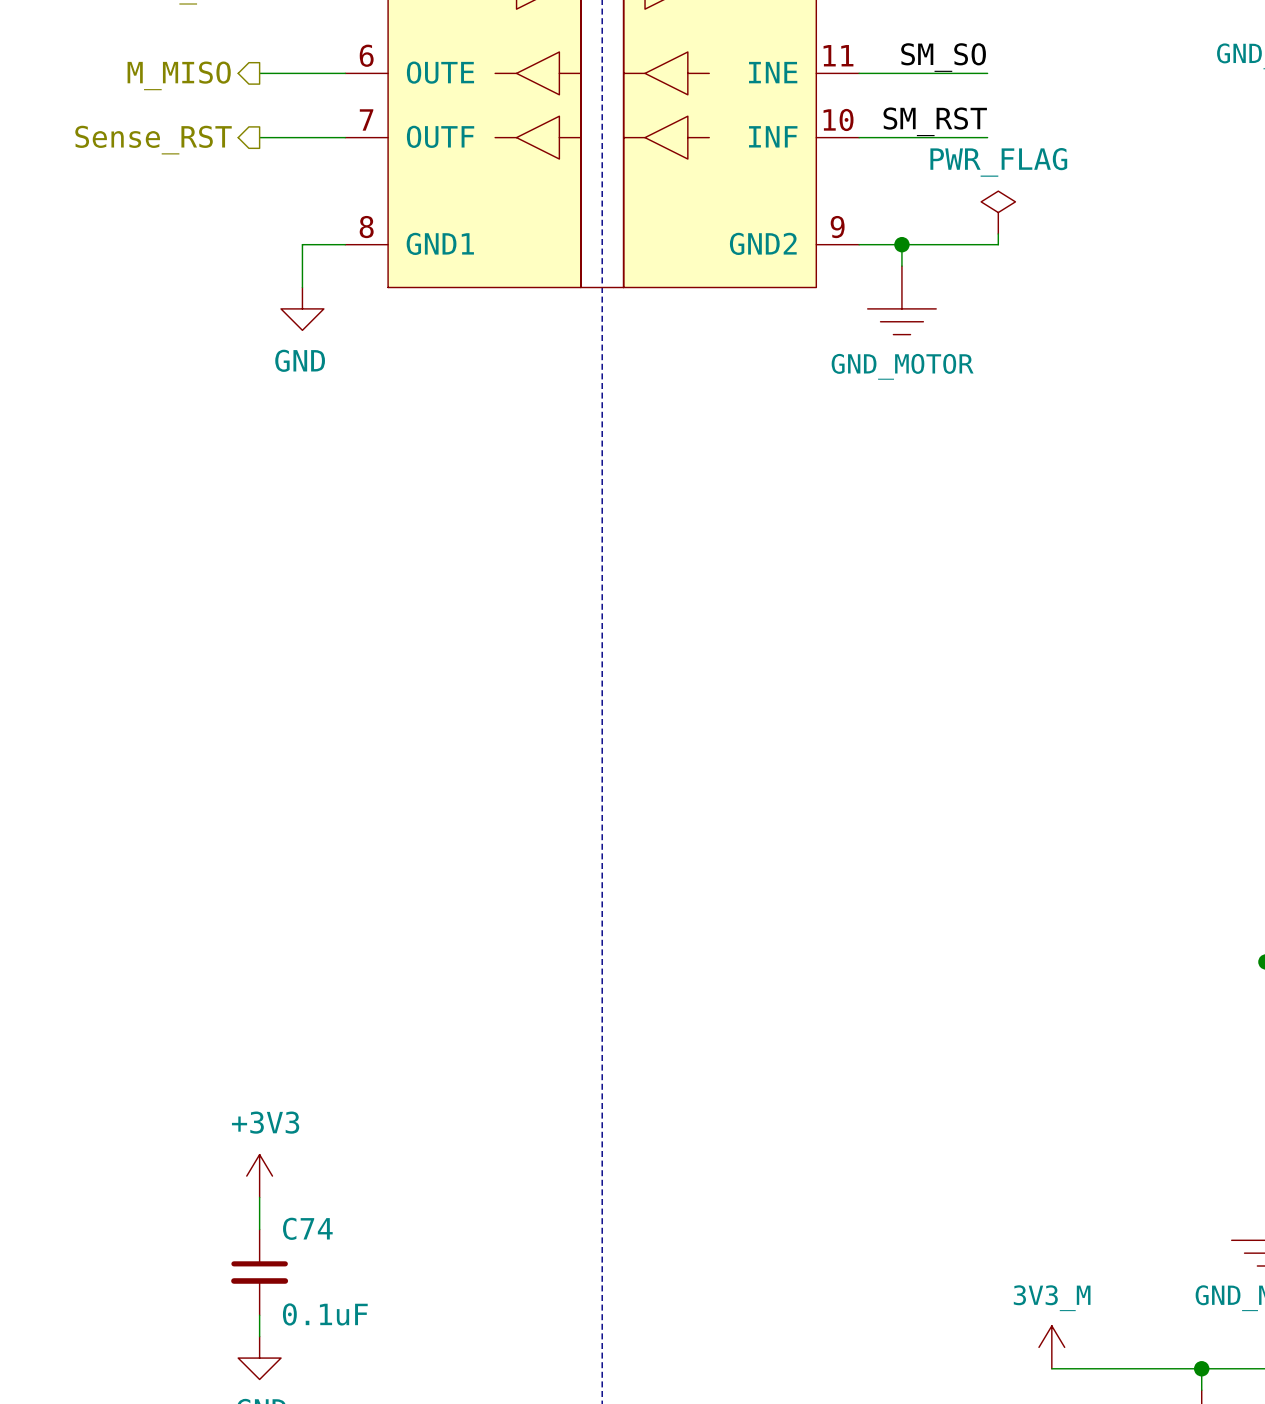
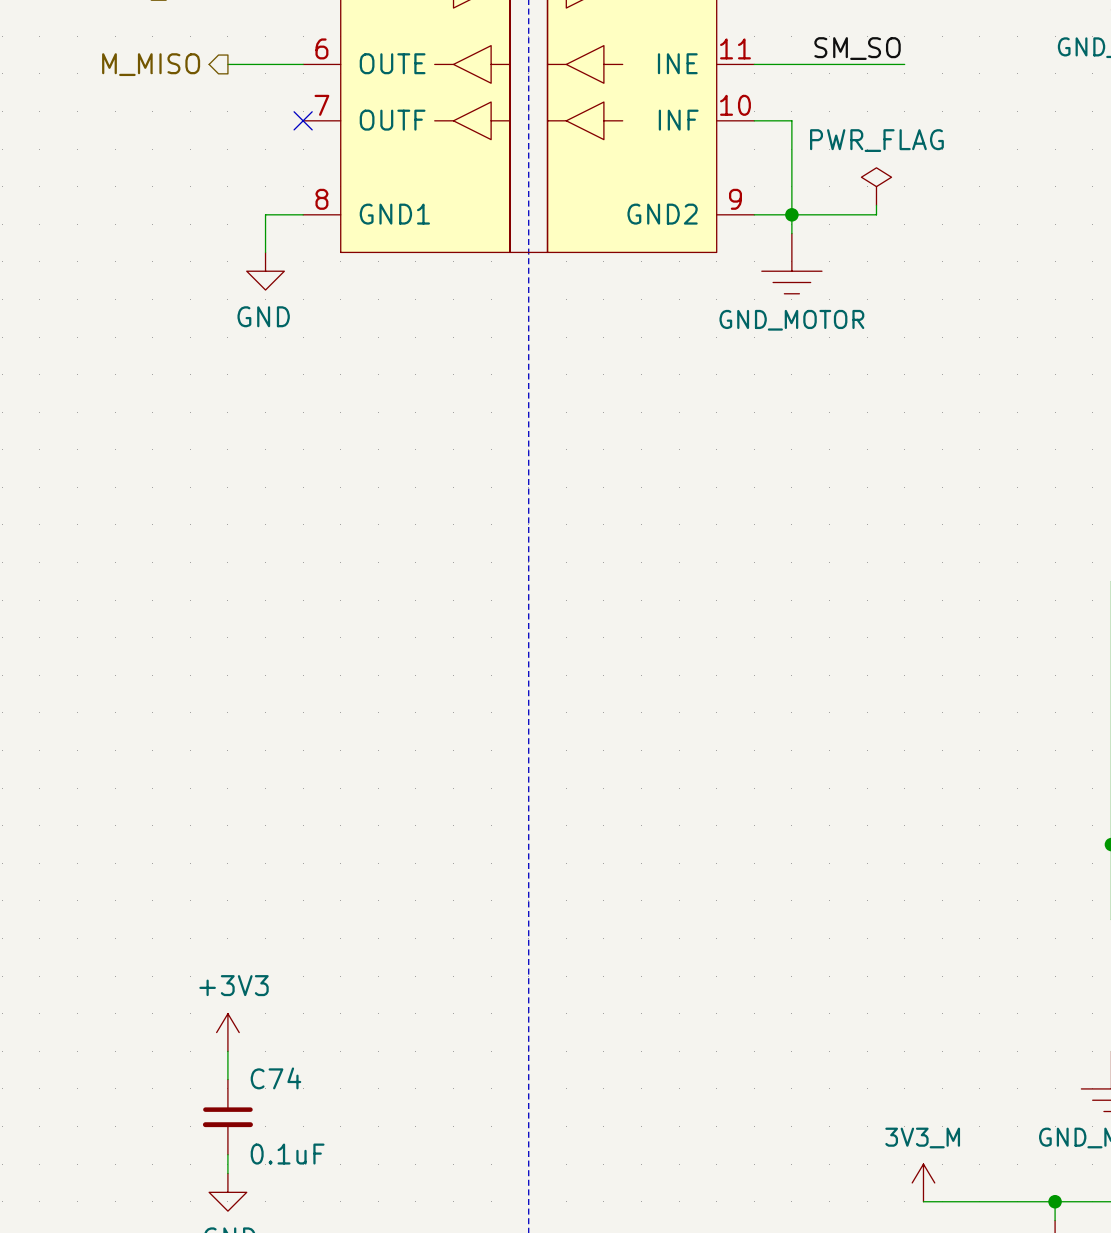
label position: SM_SO (943, 57) -> SM_SO (857, 48)
wire: none -> (867, 64) (904, 64)
label: SM_RST (935, 121) -> none
wire: (259, 137) (345, 137) -> none
no-connect mark: none -> (303, 120)
wire: (901, 137) (987, 137) -> (791, 120) (791, 214)
hierarchical label: Sense_RST (153, 140) -> none

